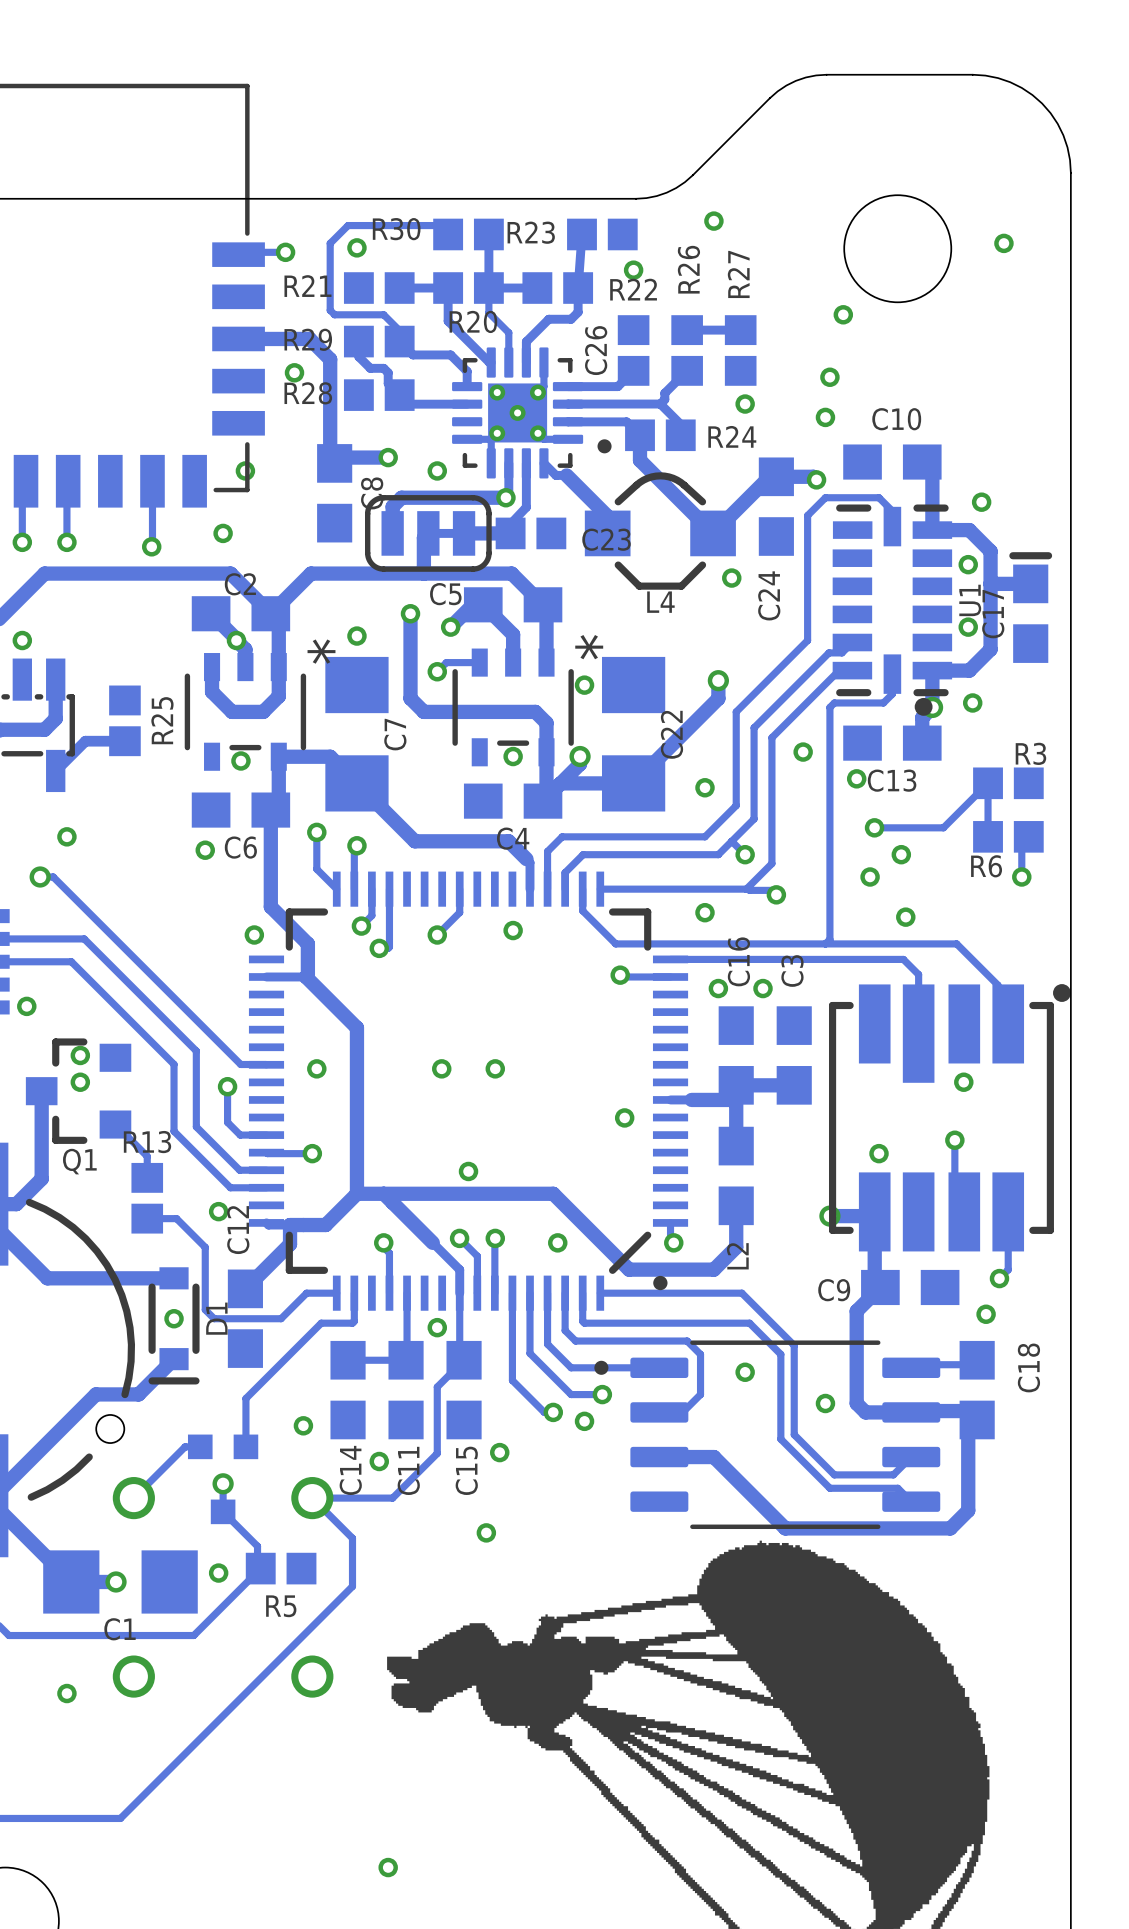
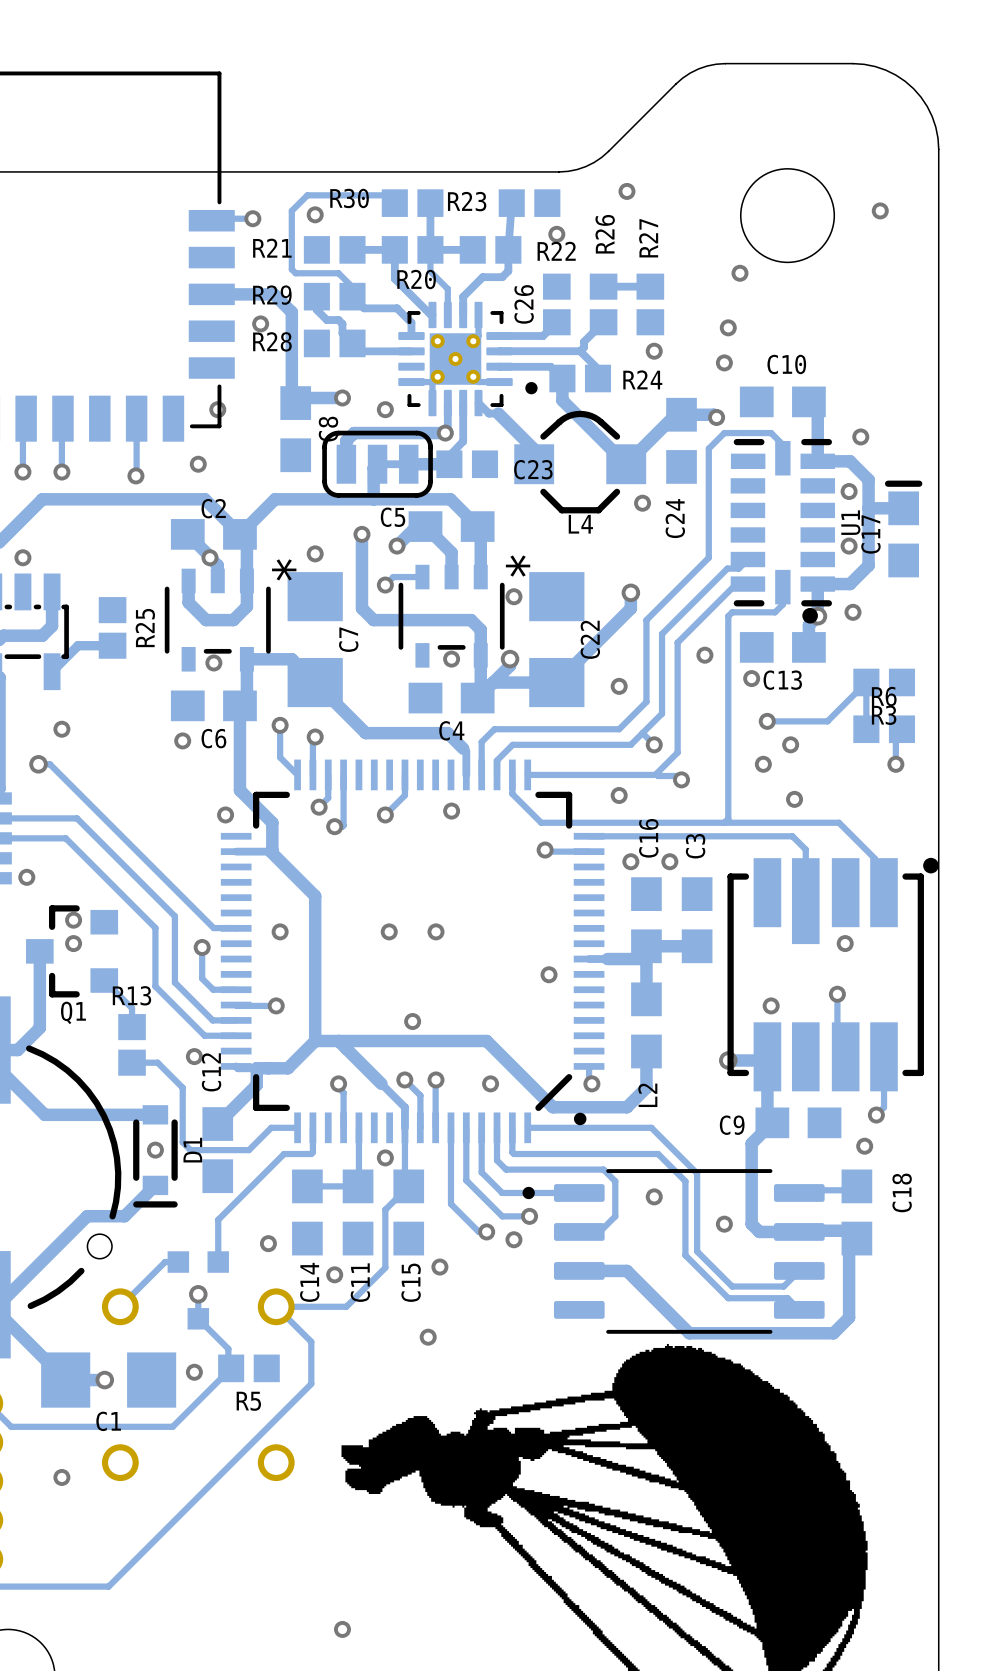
R3 name position: R3 (1030, 753) -> R3 (884, 715)
R6 name position: R6 (986, 866) -> R6 (884, 696)

